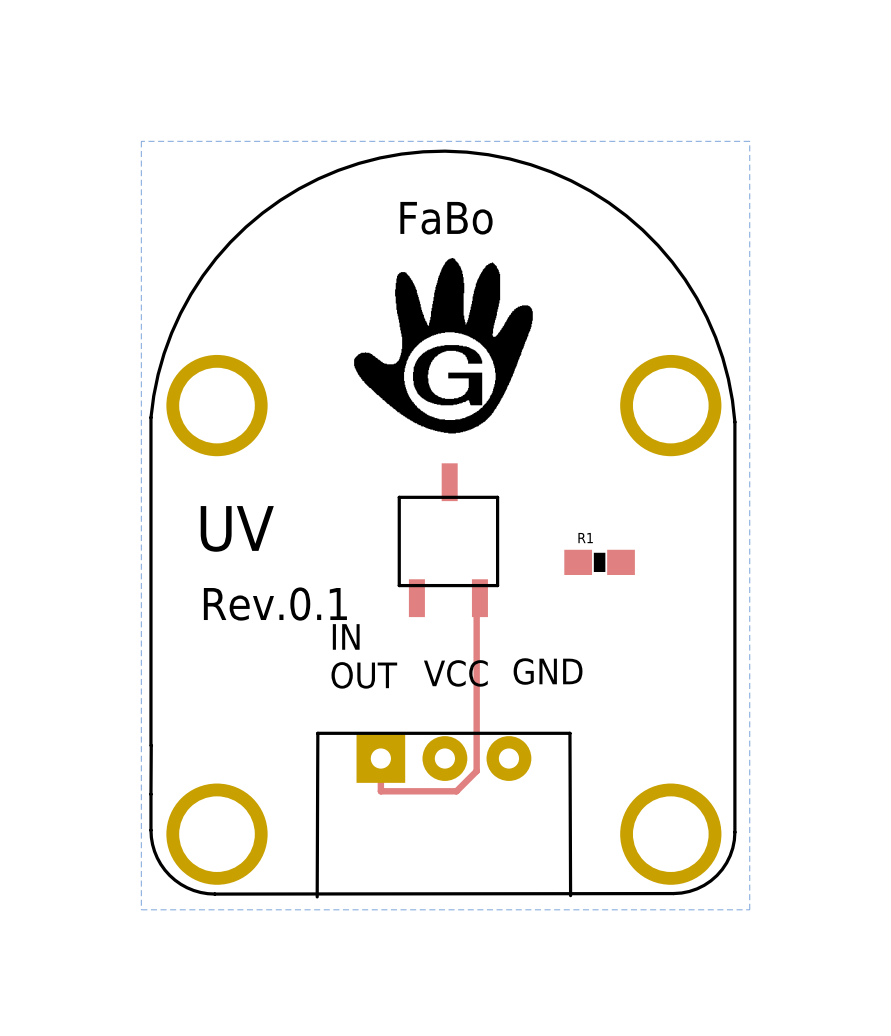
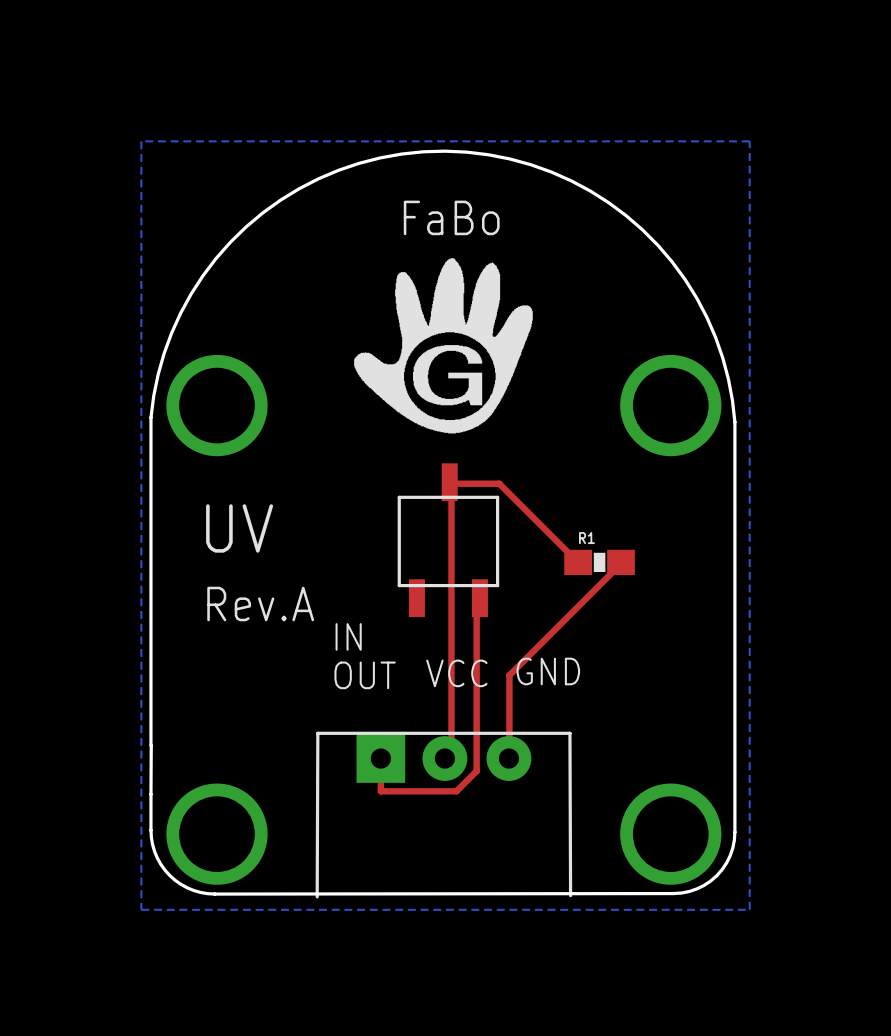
top track: none -> (578, 562) (499, 483) (449, 482) (451, 486) (451, 753) (444, 758)
top track: none -> (621, 562) (509, 675) (509, 758)
text: Rev.0.1 (275, 604) -> Rev.A (260, 604)

